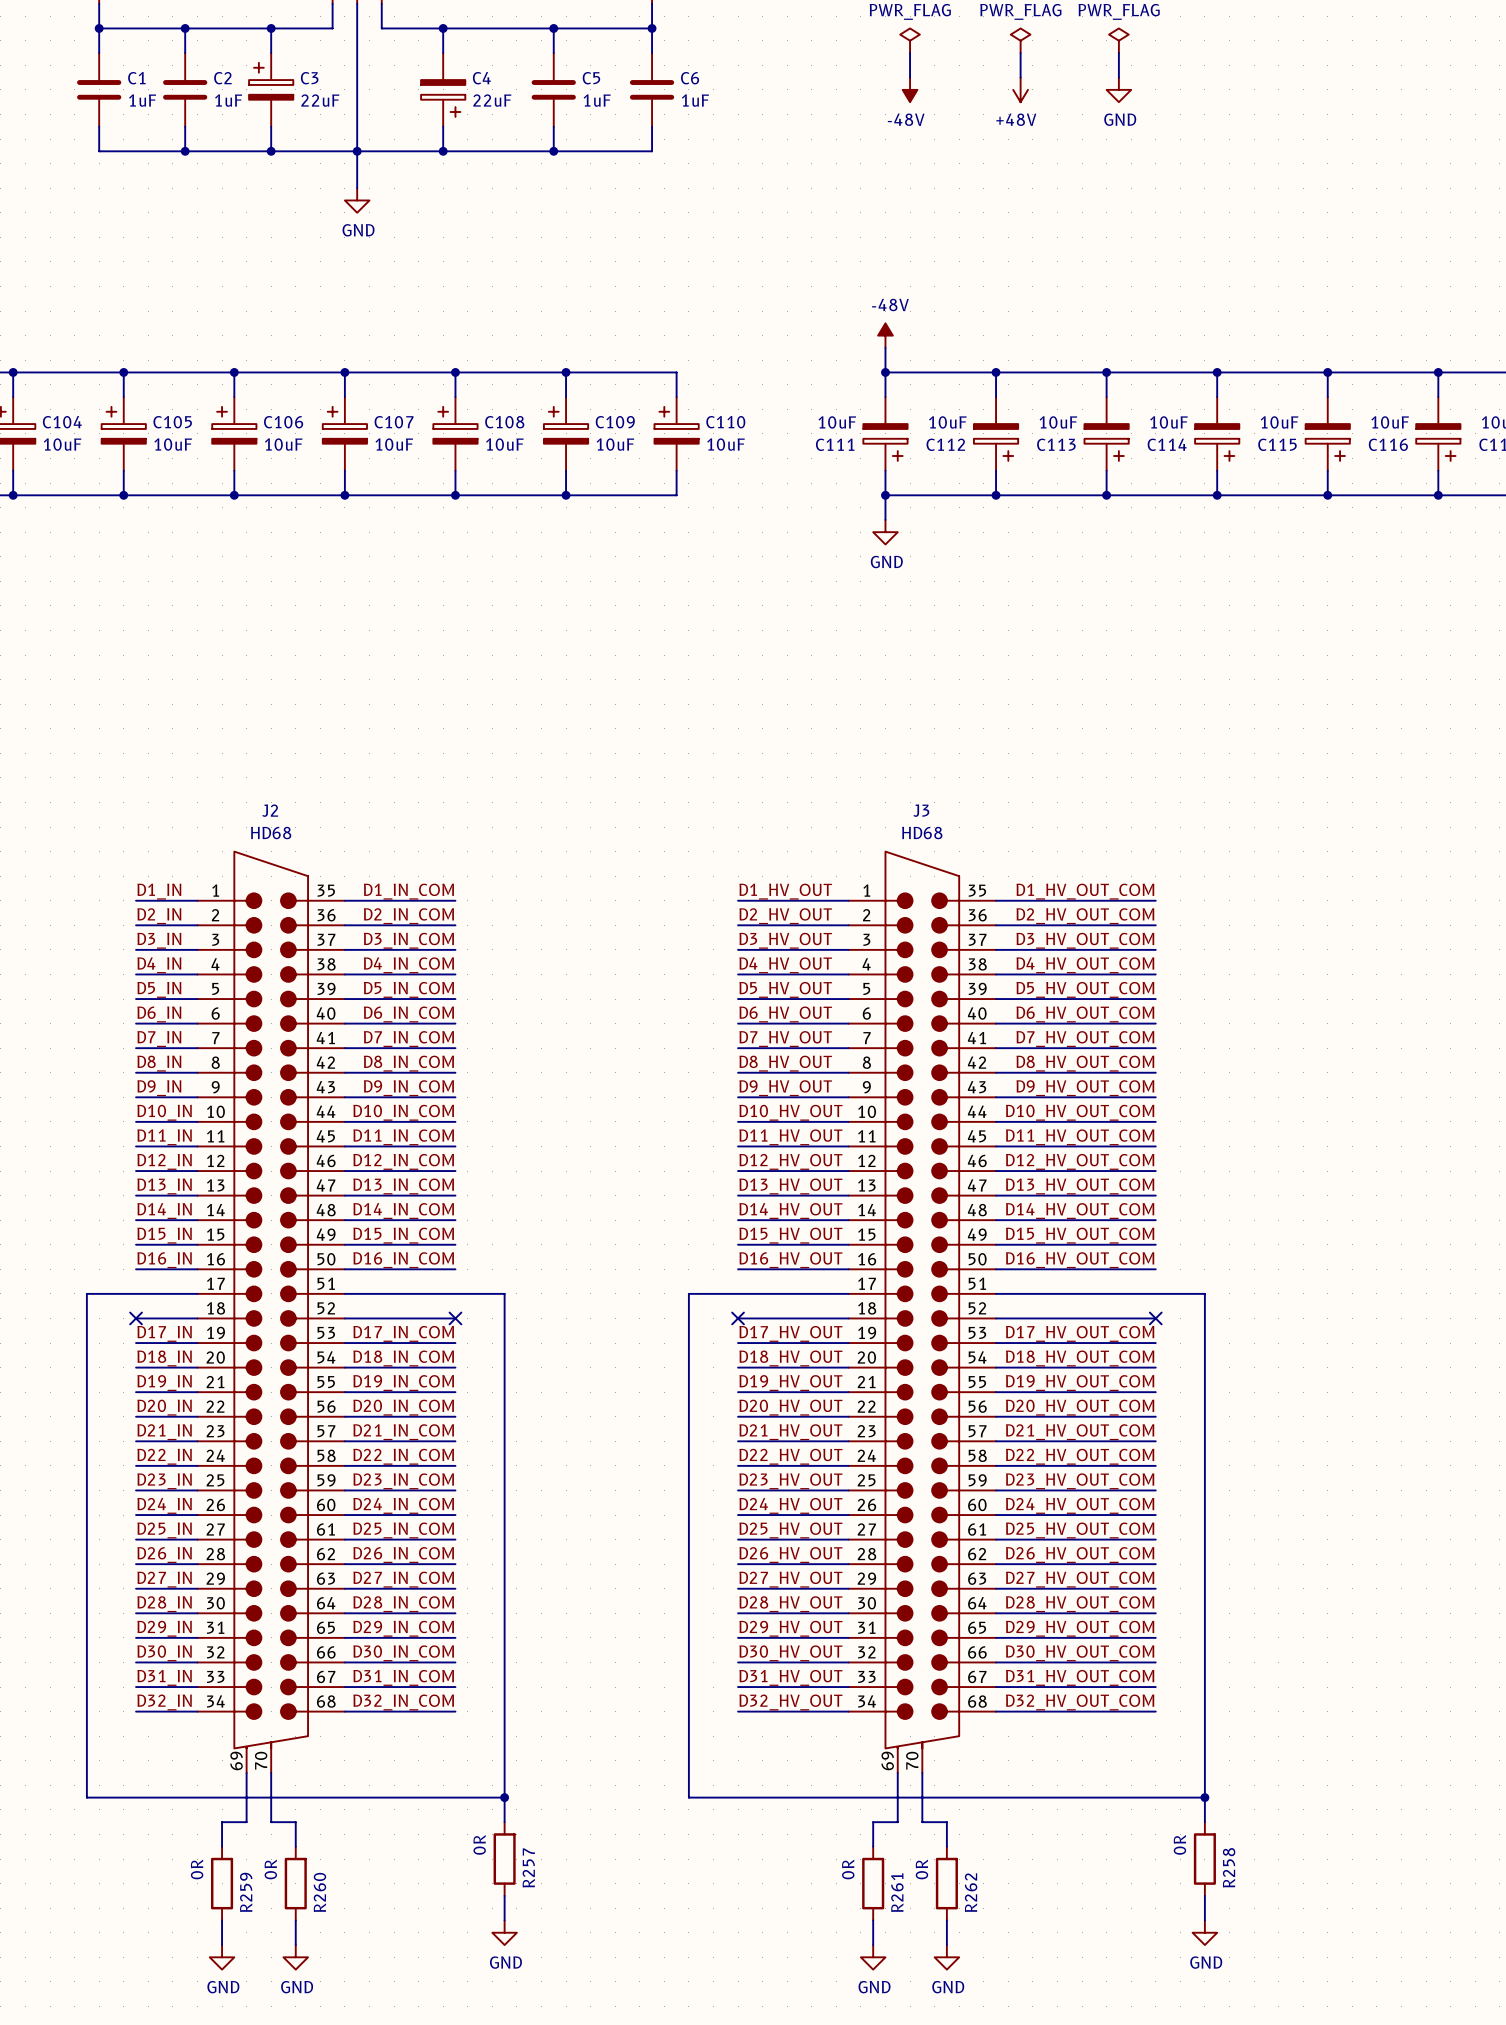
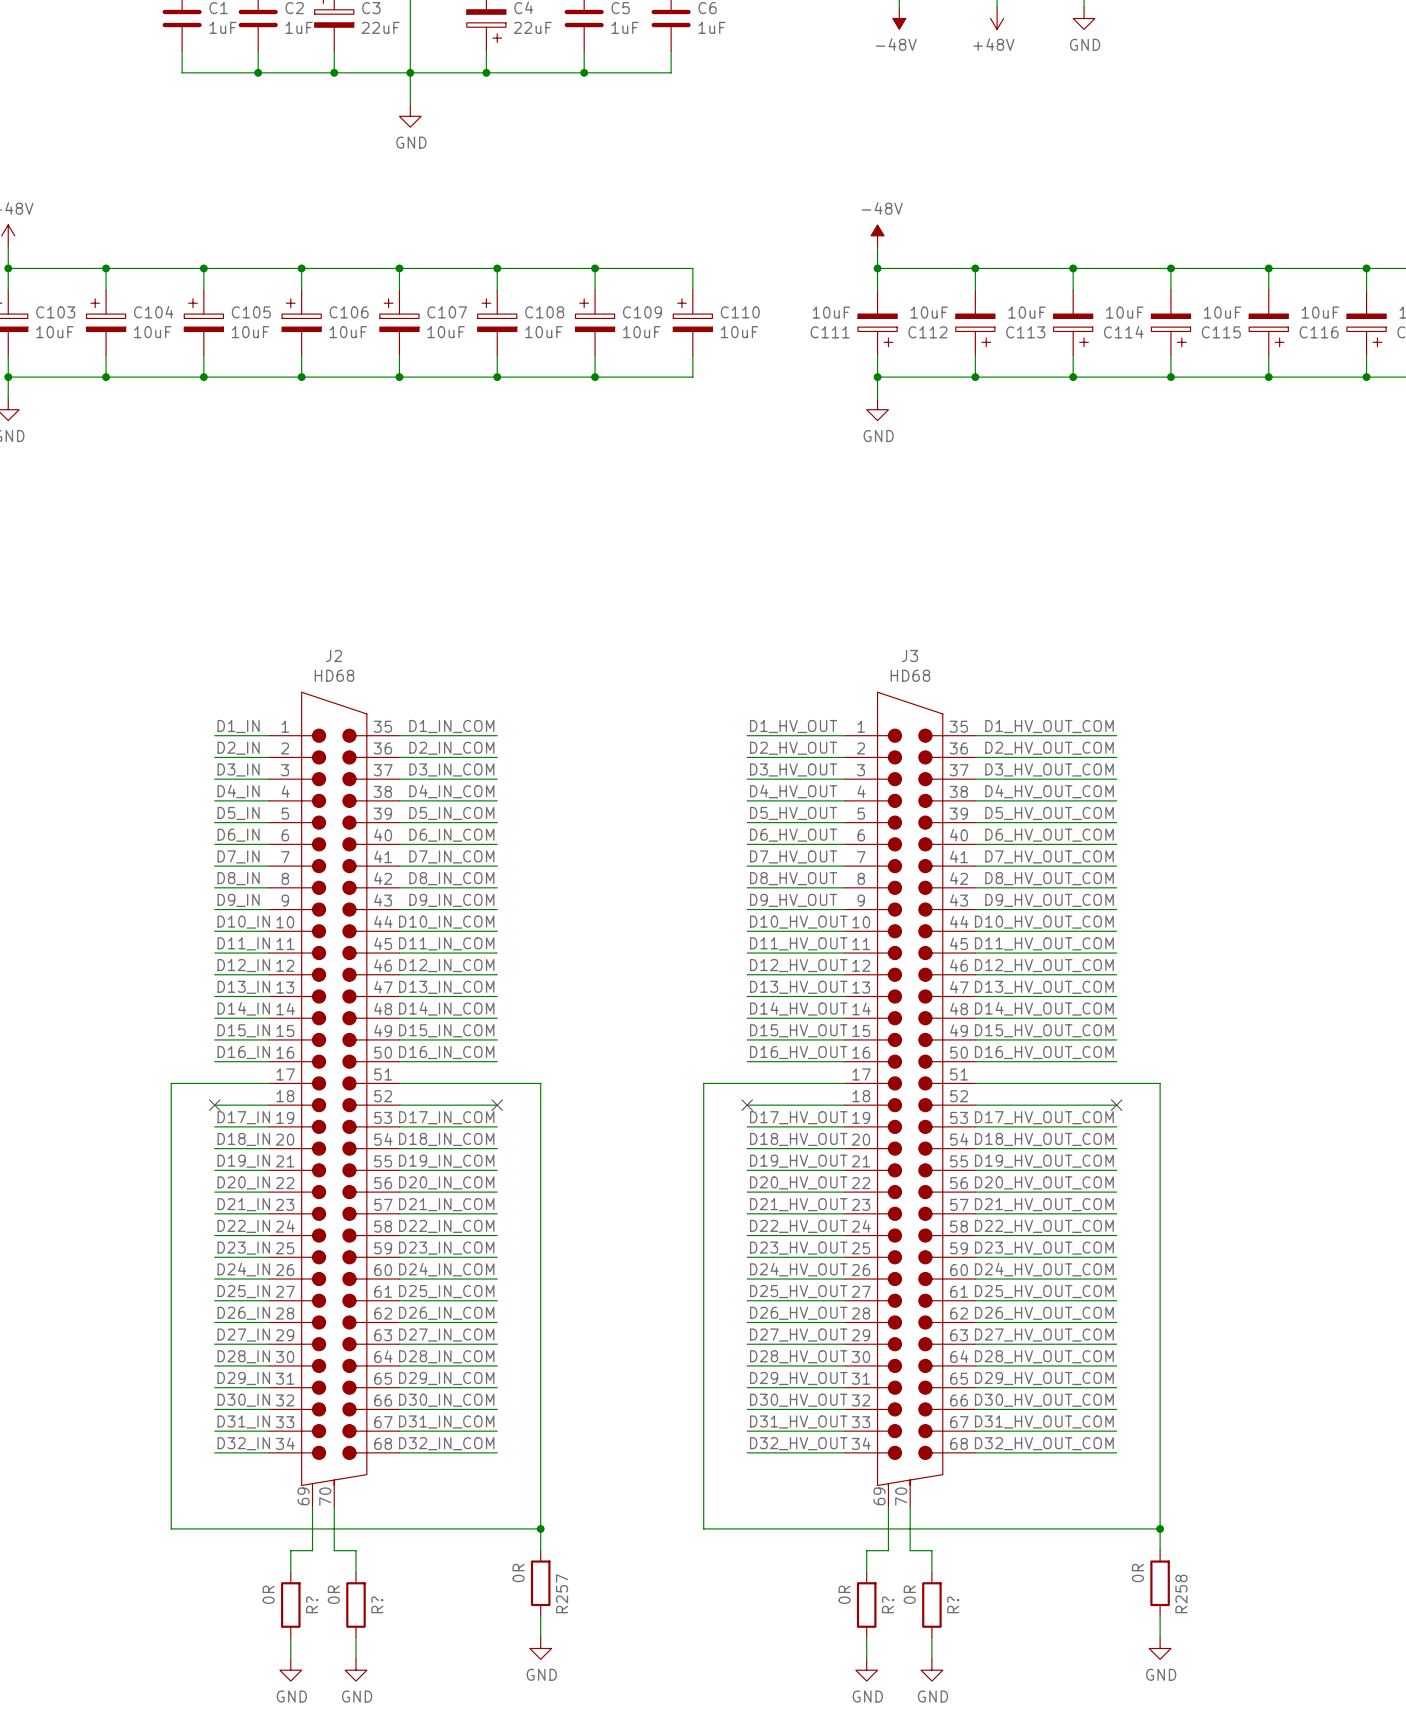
R259 name: R259 (246, 1892) -> R? (312, 1604)
R260 name: R260 (319, 1892) -> R? (377, 1604)
R261 name: R261 (897, 1892) -> R? (888, 1604)
R262 name: R262 (971, 1892) -> R? (953, 1604)

